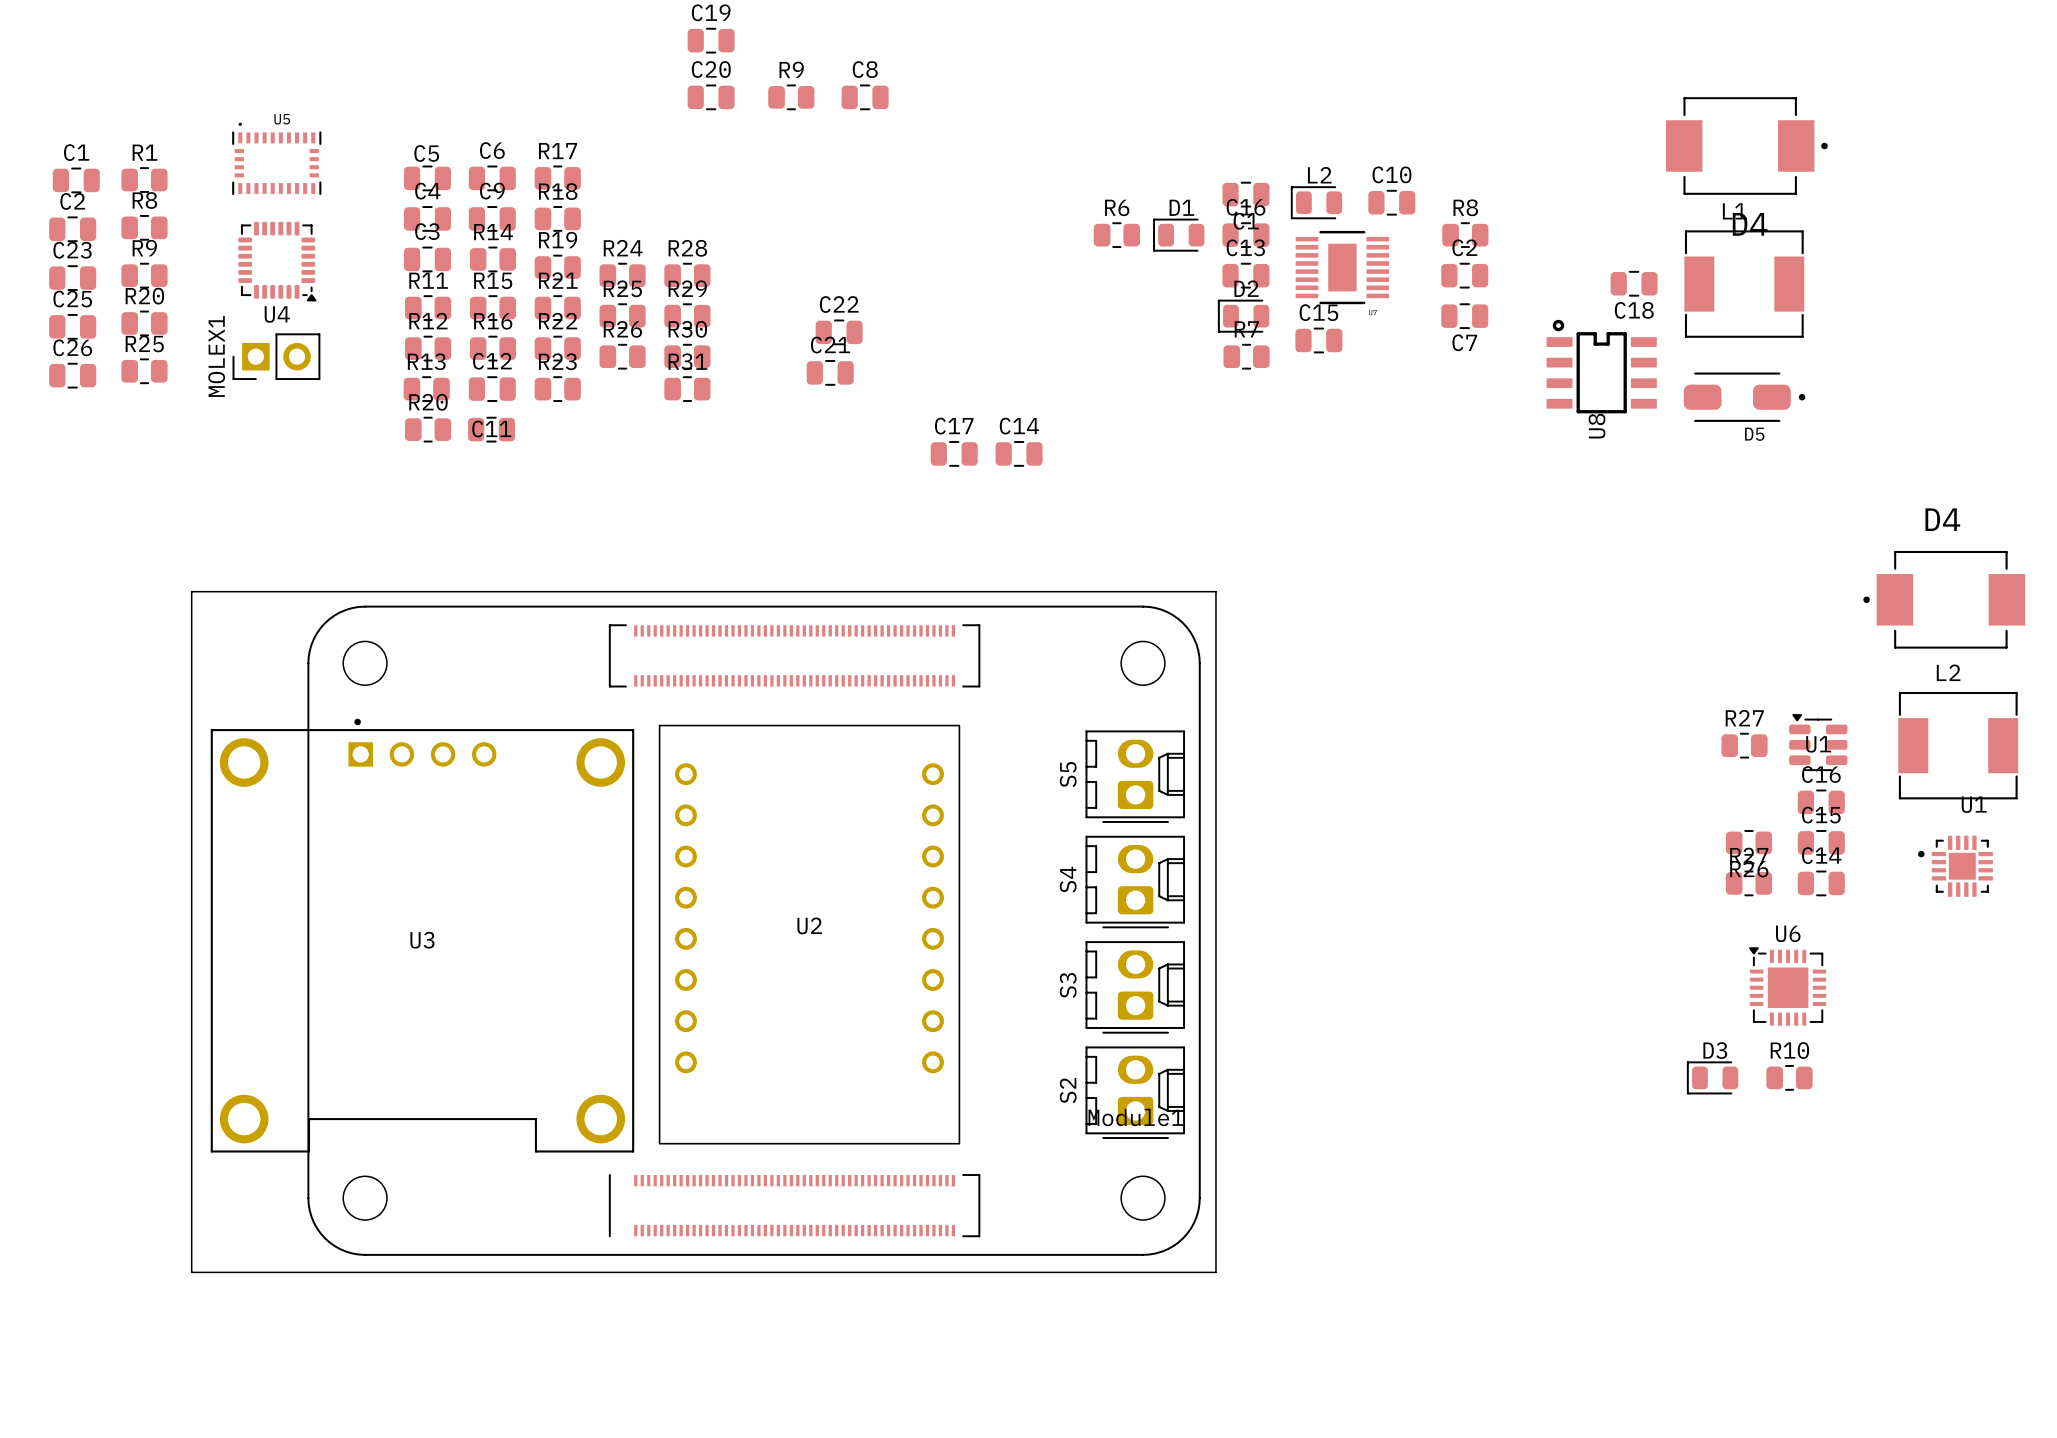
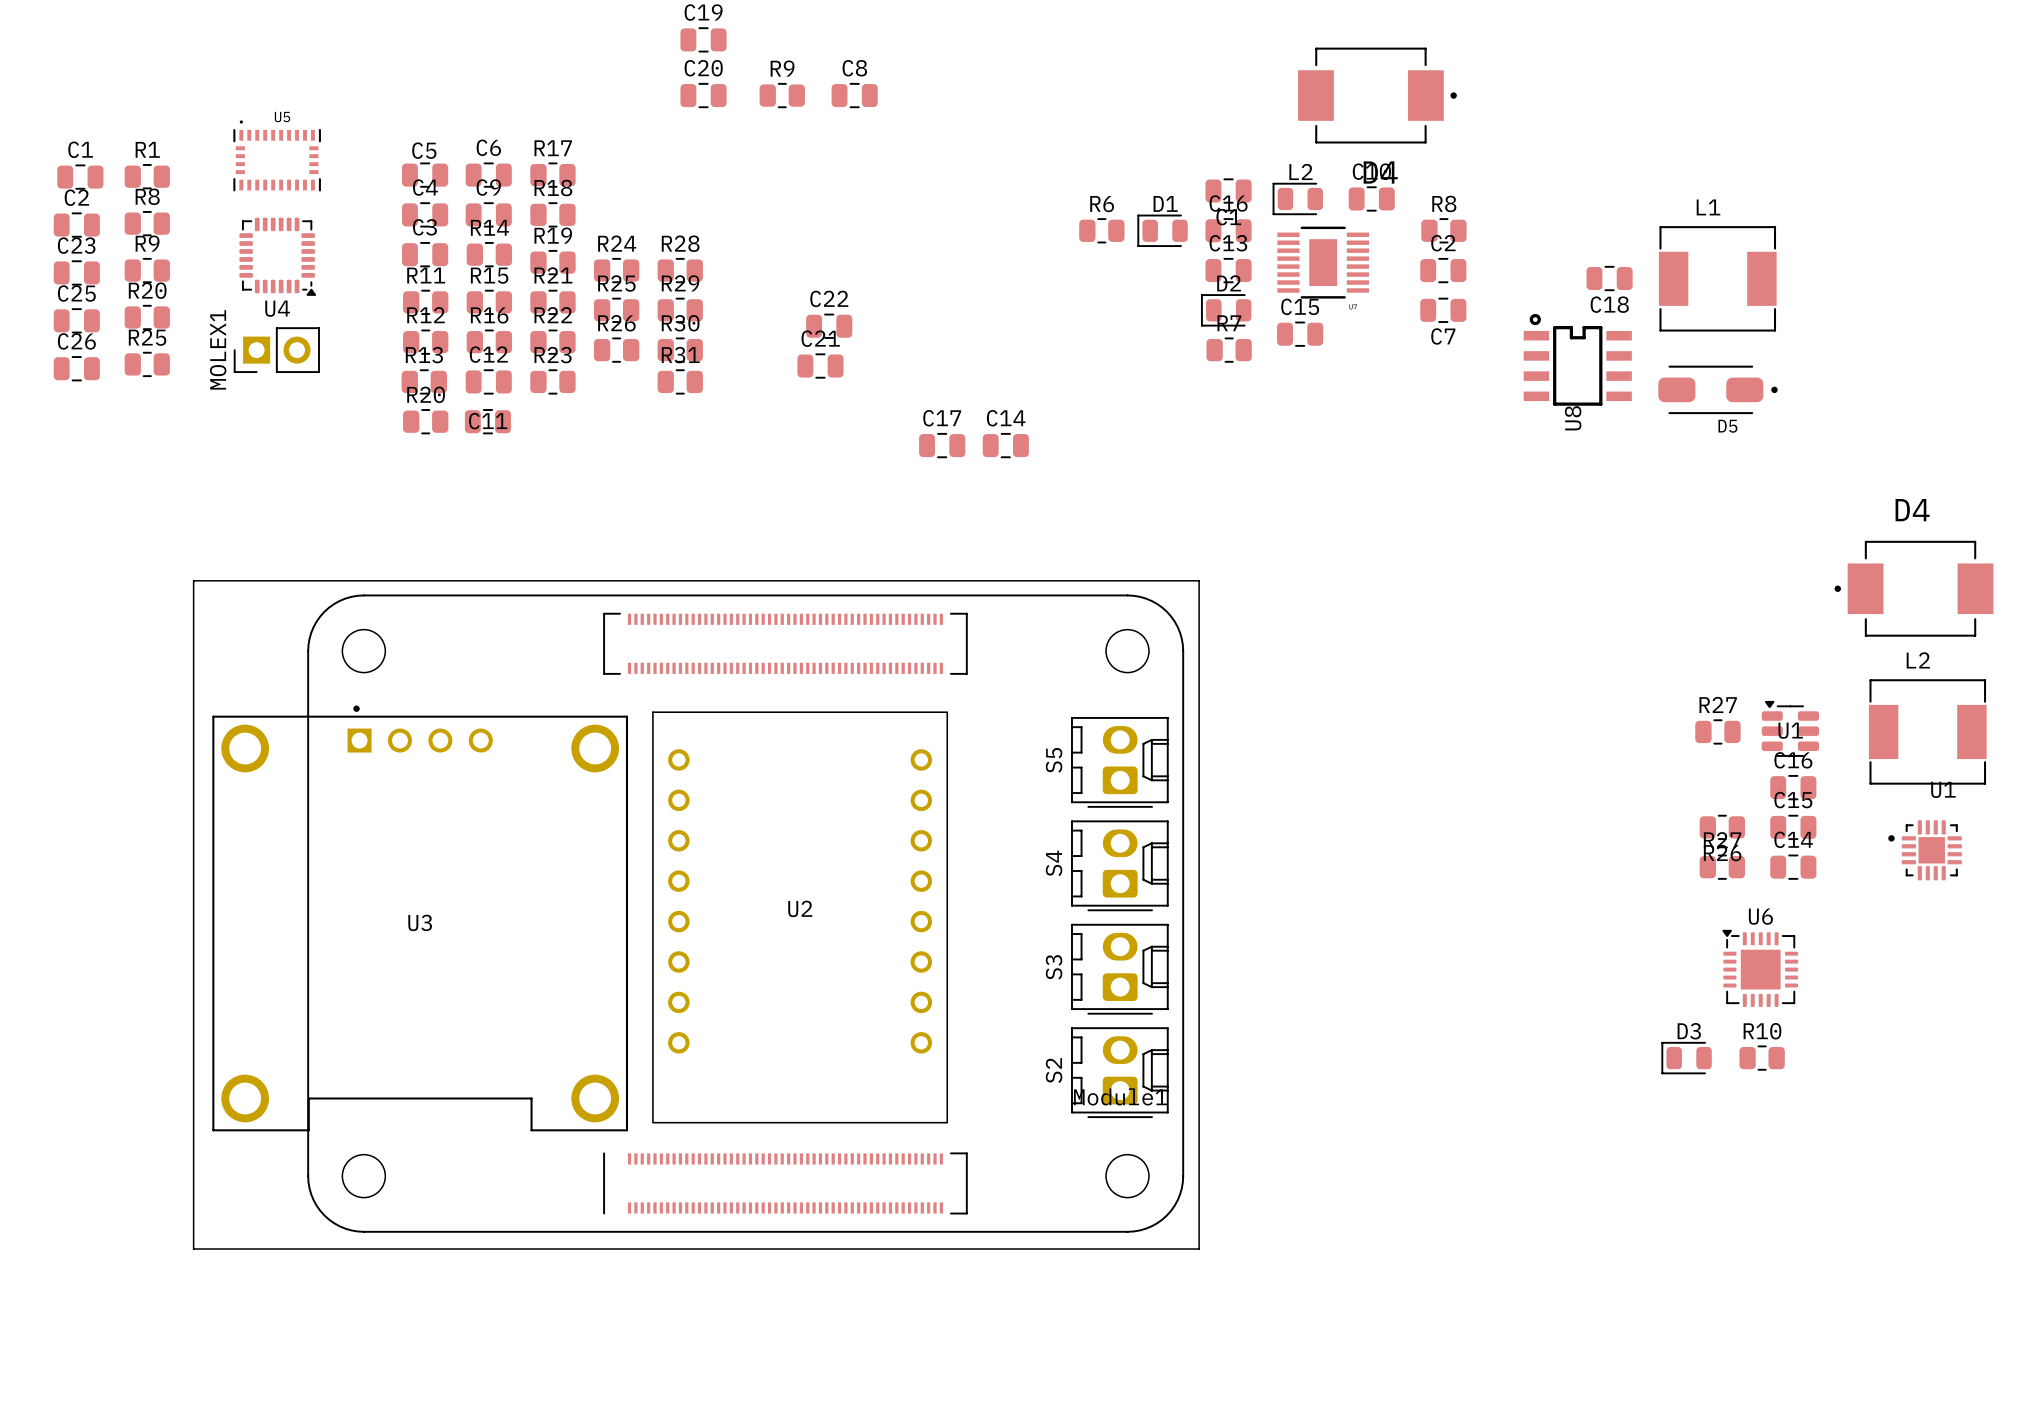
D4 position: (1746, 145) -> (1377, 95)

